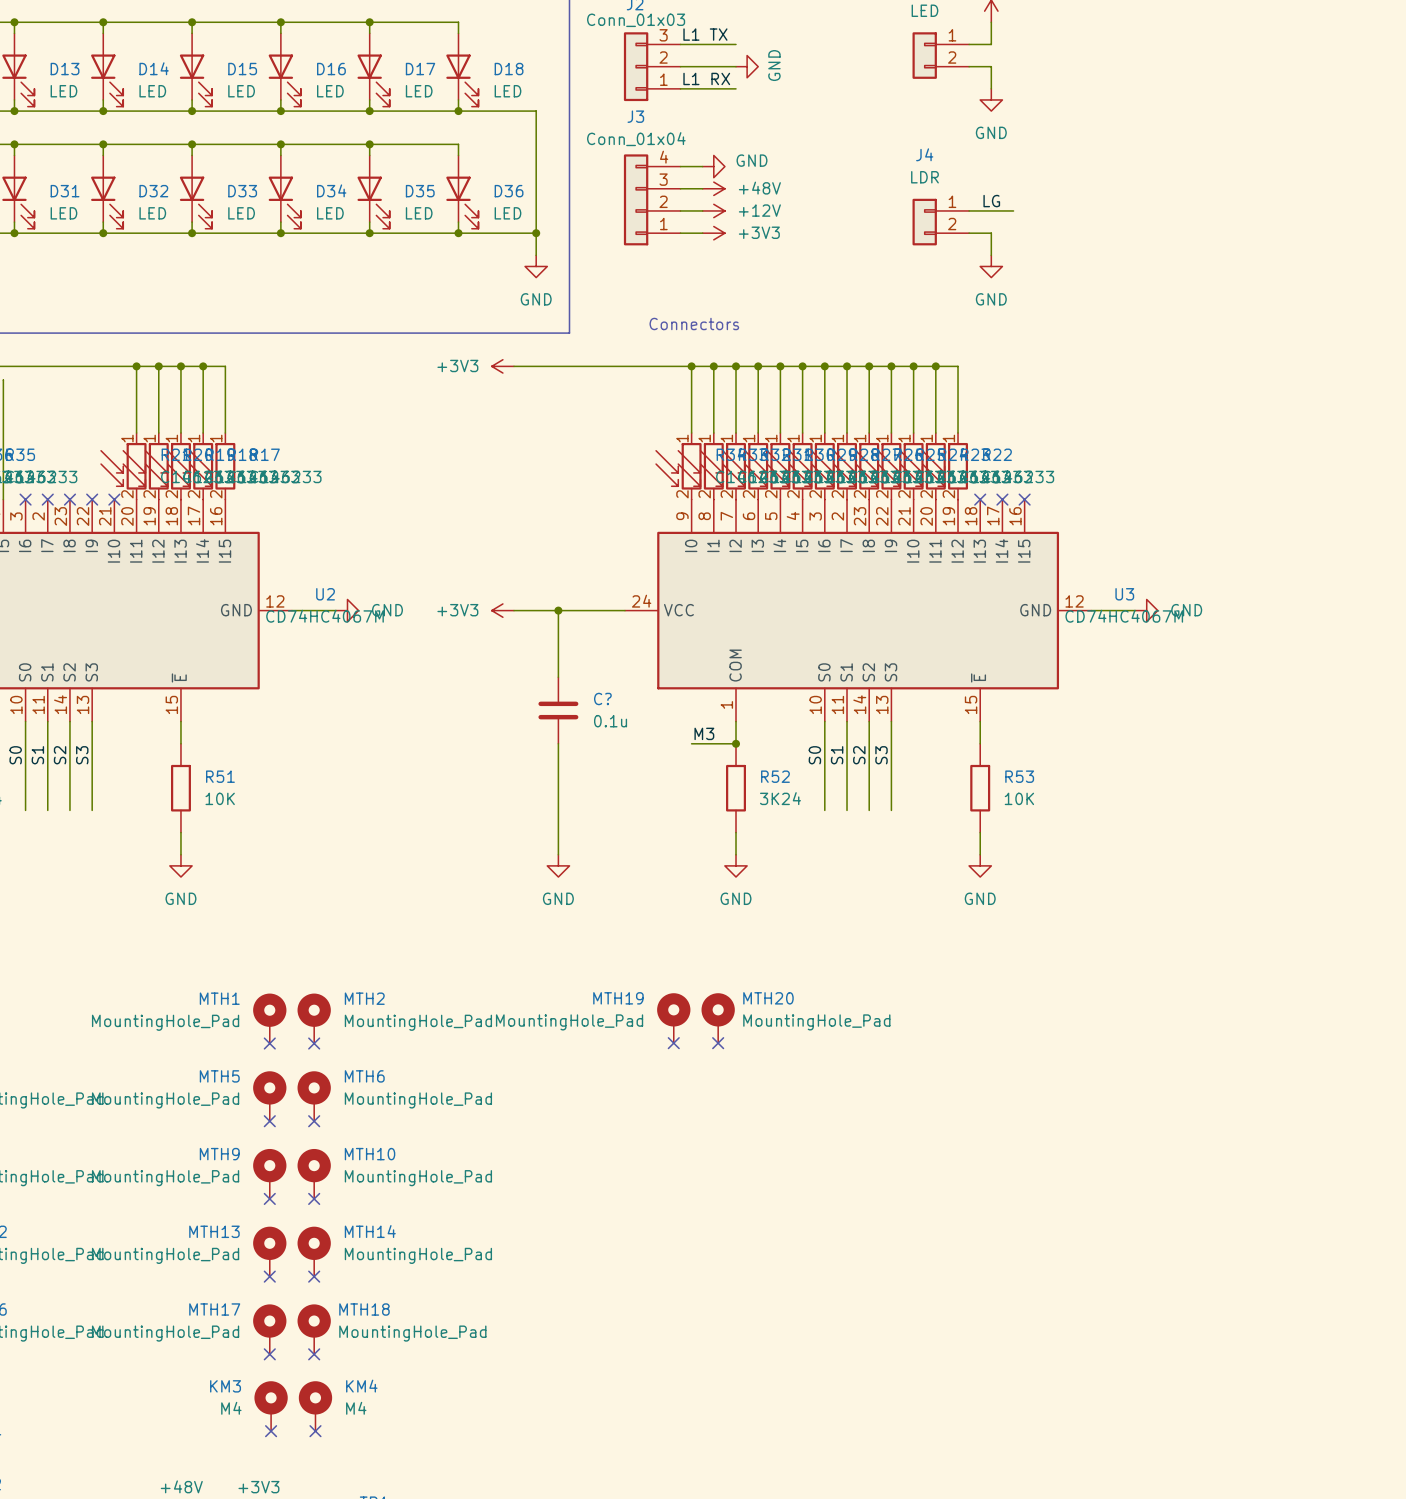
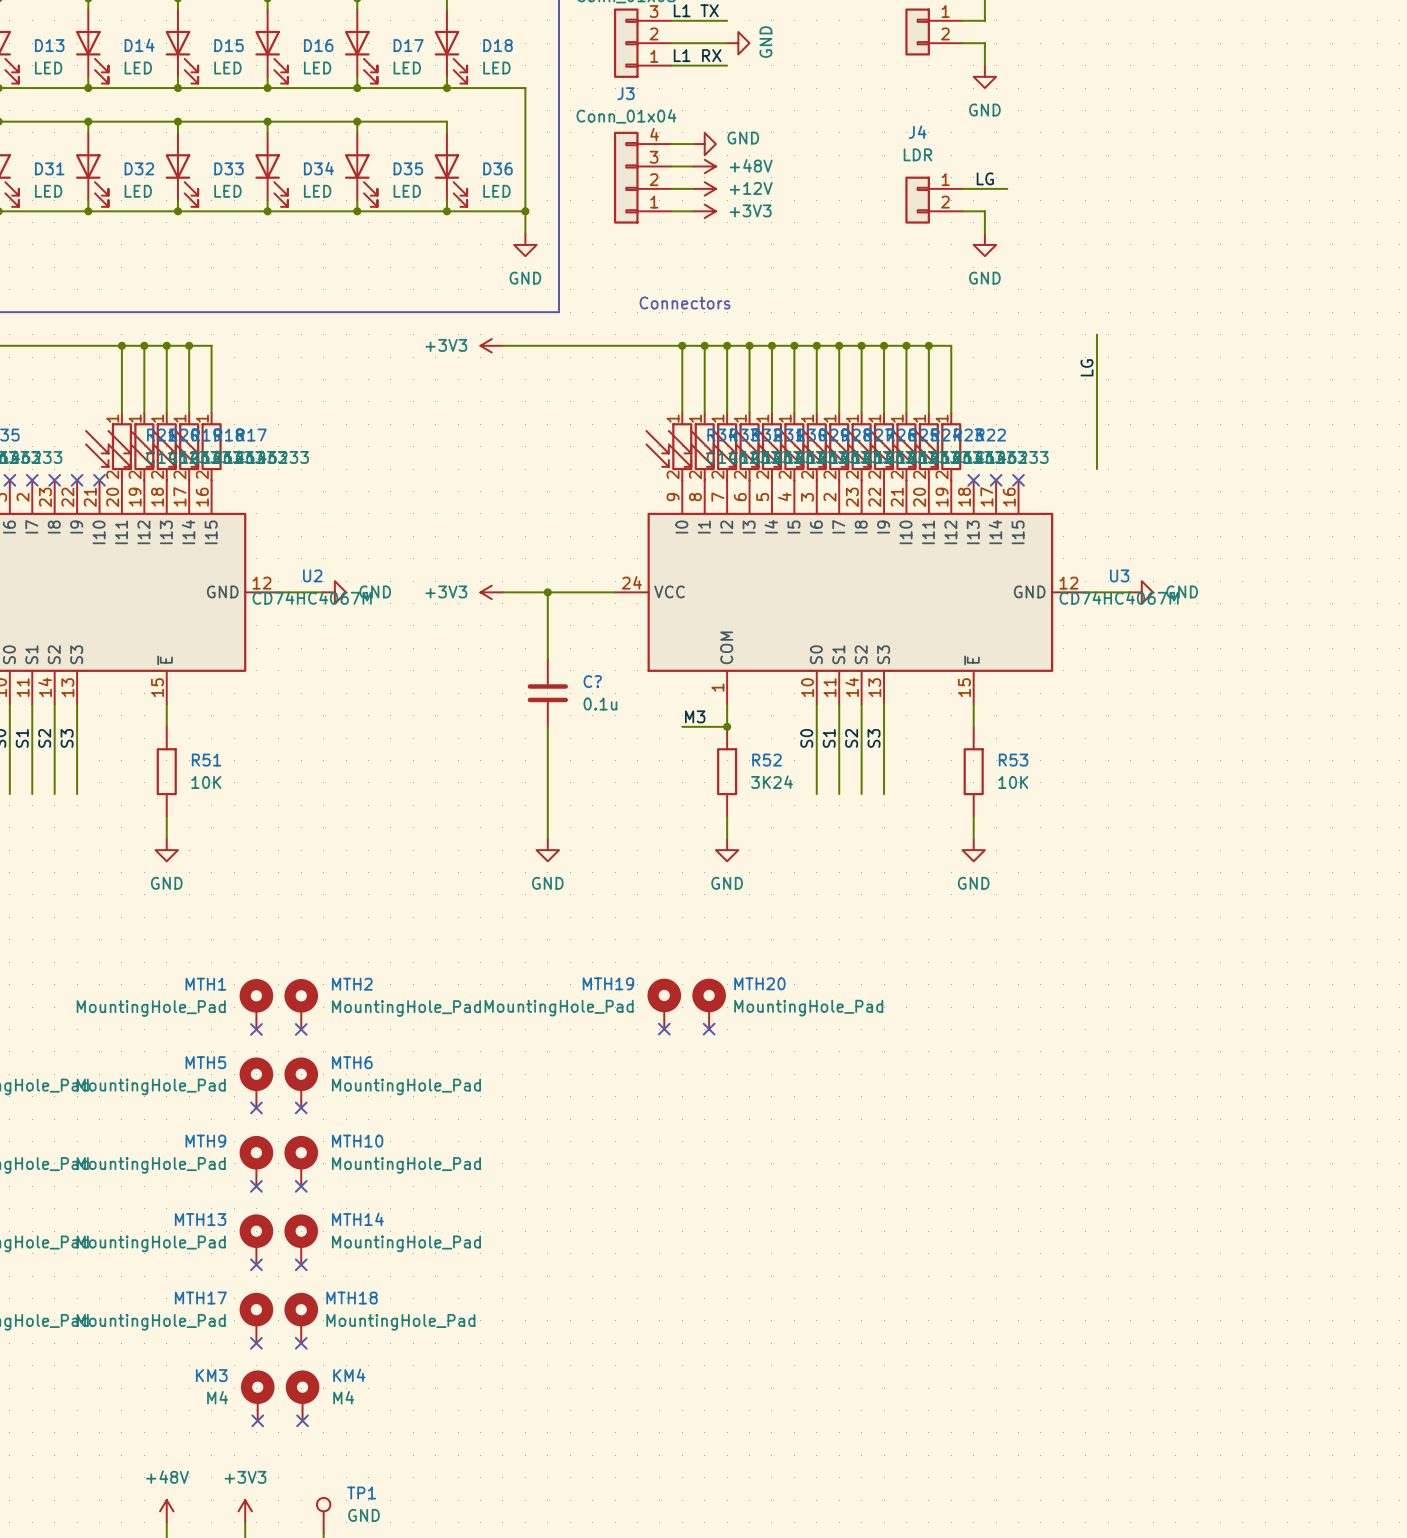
wire: none -> (1096, 334) (1096, 469)
label: none -> LG (1086, 367)

